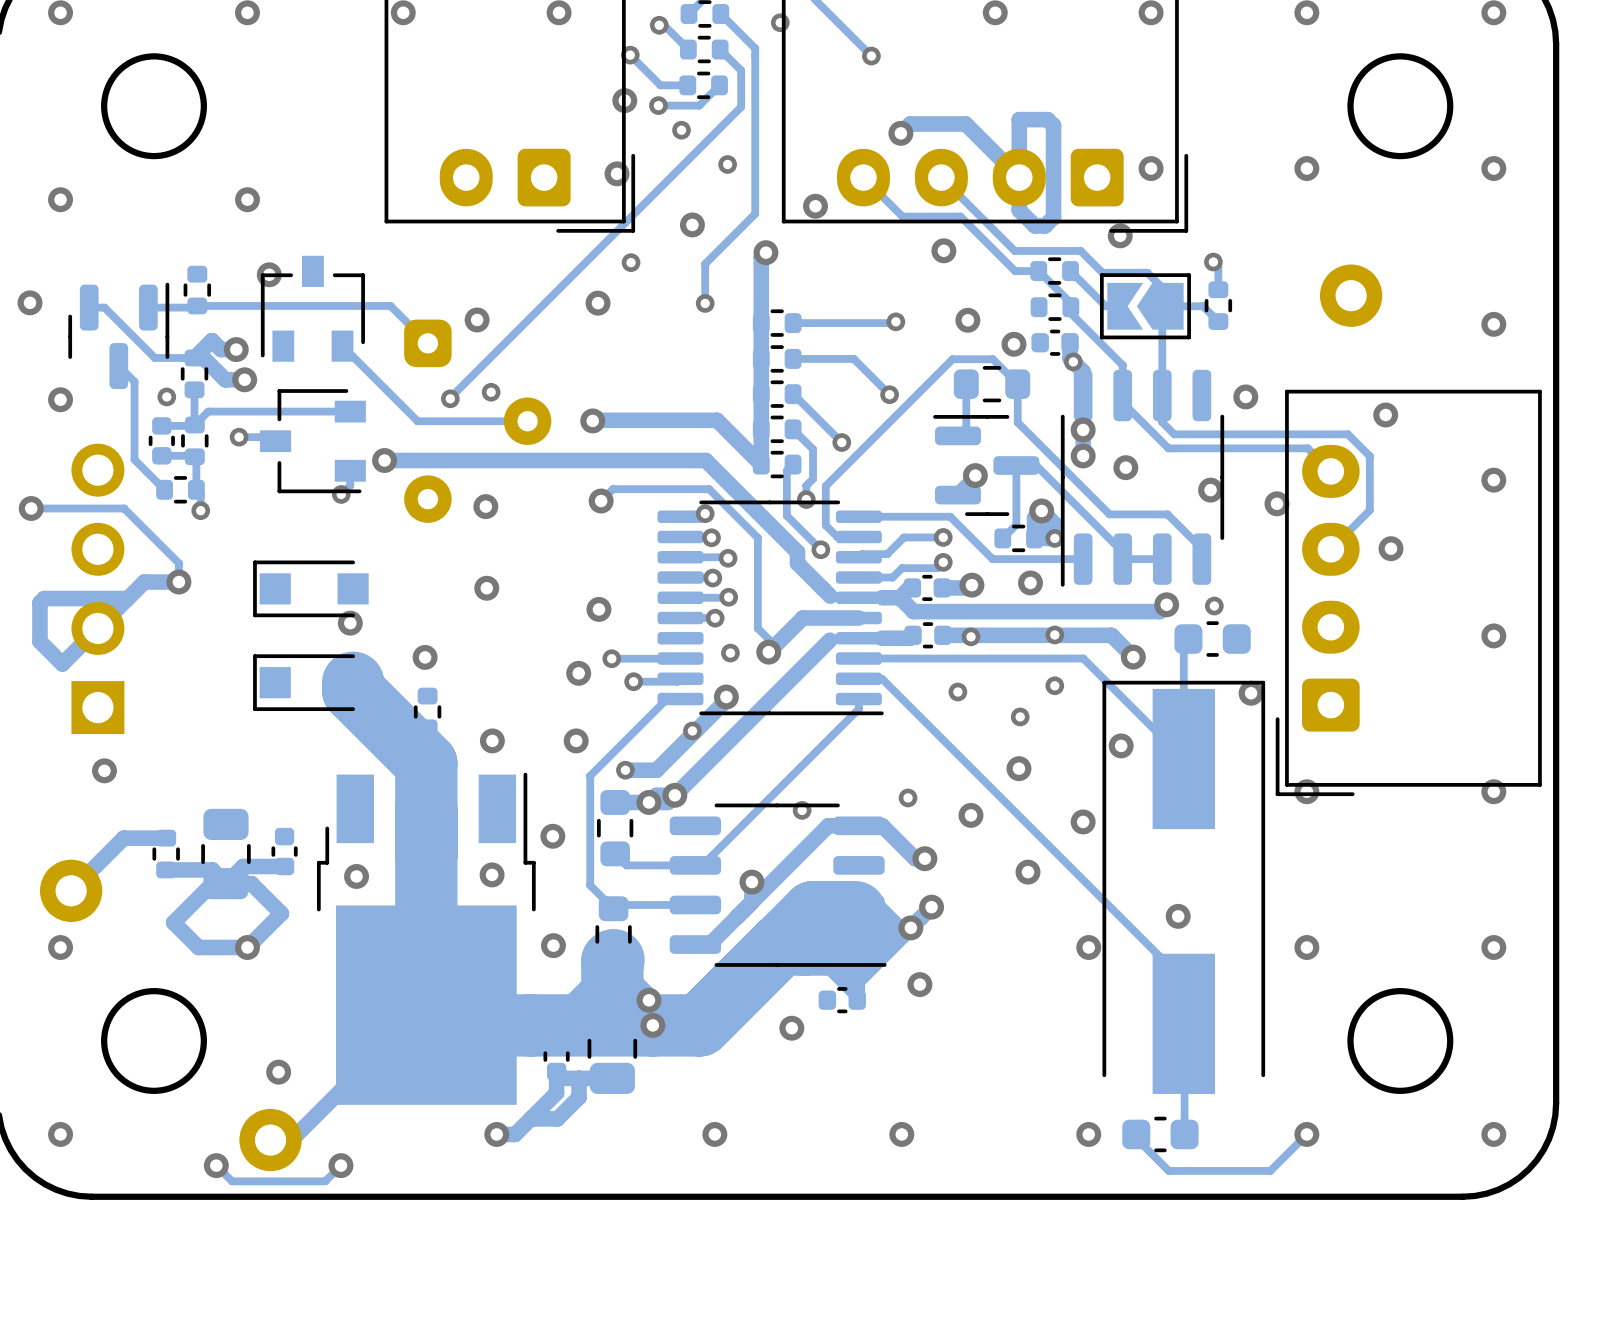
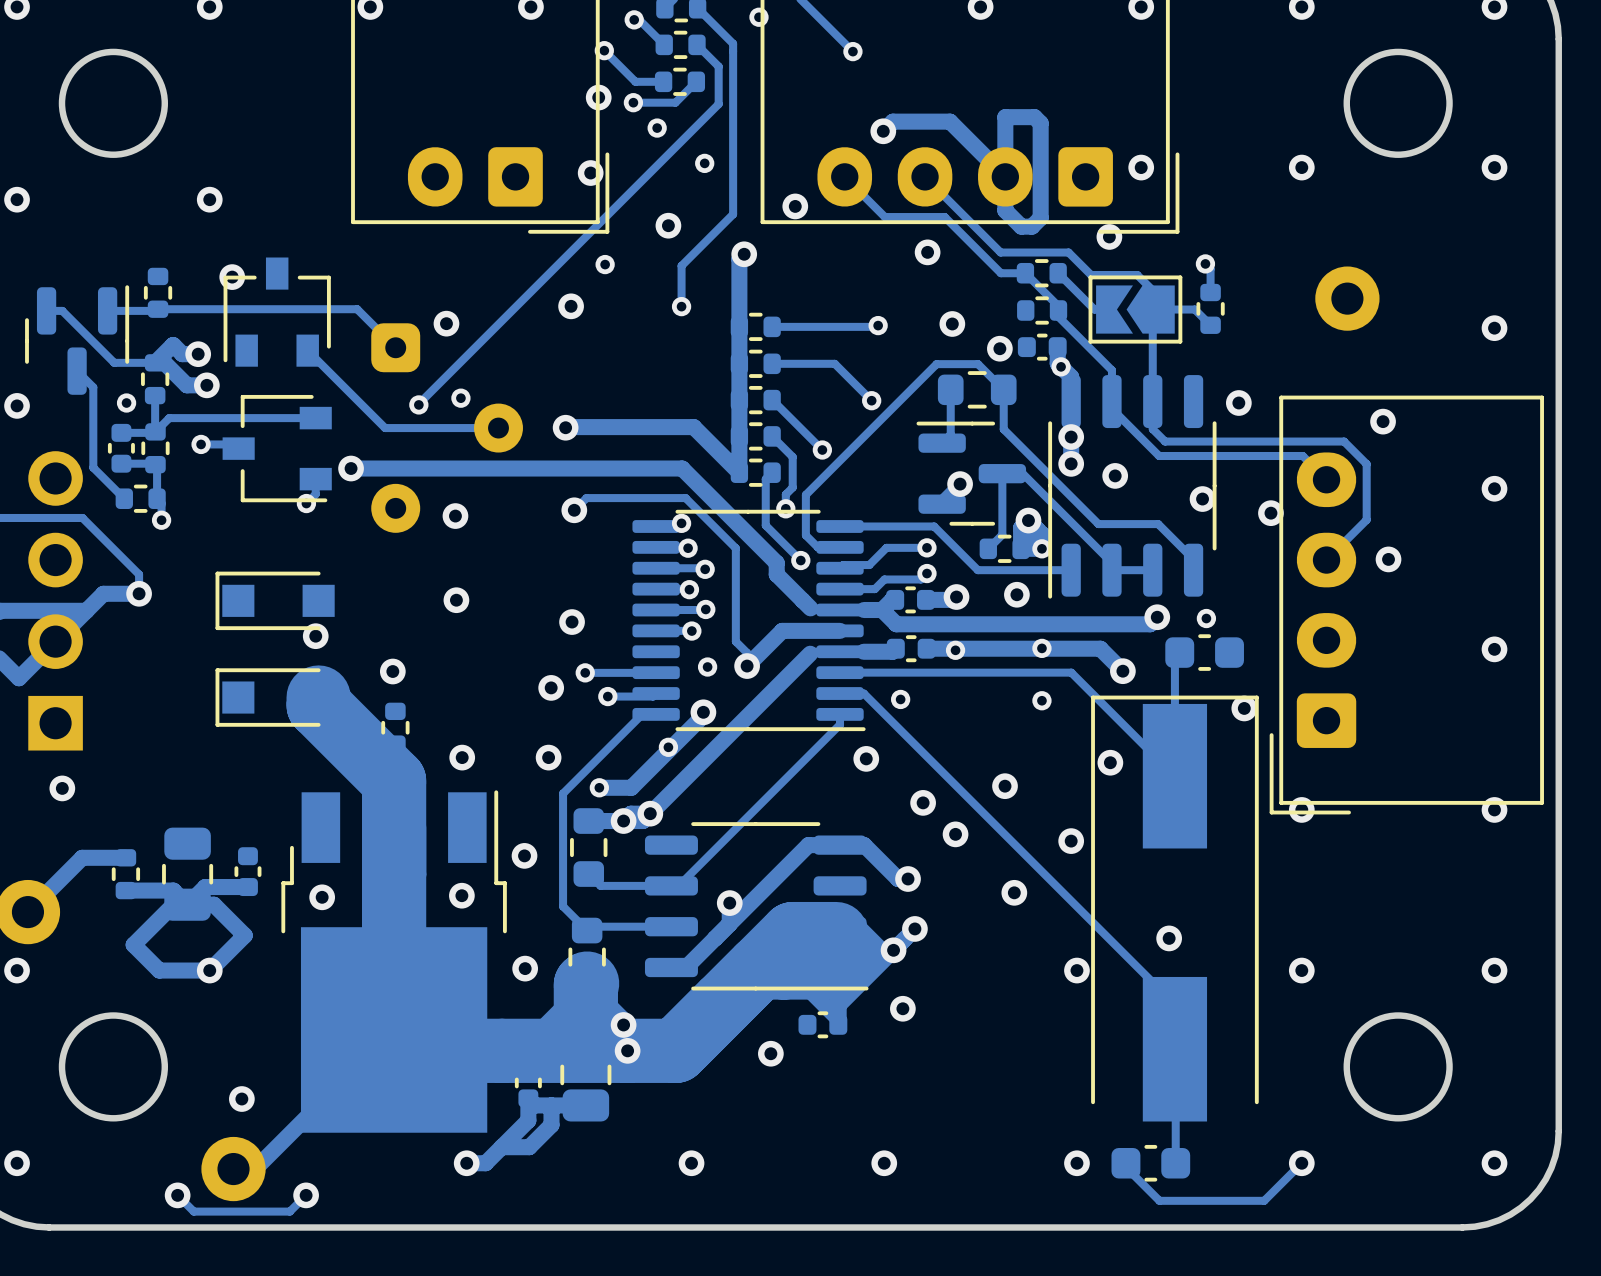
via position: (957, 692) -> (900, 699)
via: (1020, 716) -> none
via: none -> (866, 758)
via: none -> (923, 802)
via: (908, 797) -> none
via: (802, 810) -> none

